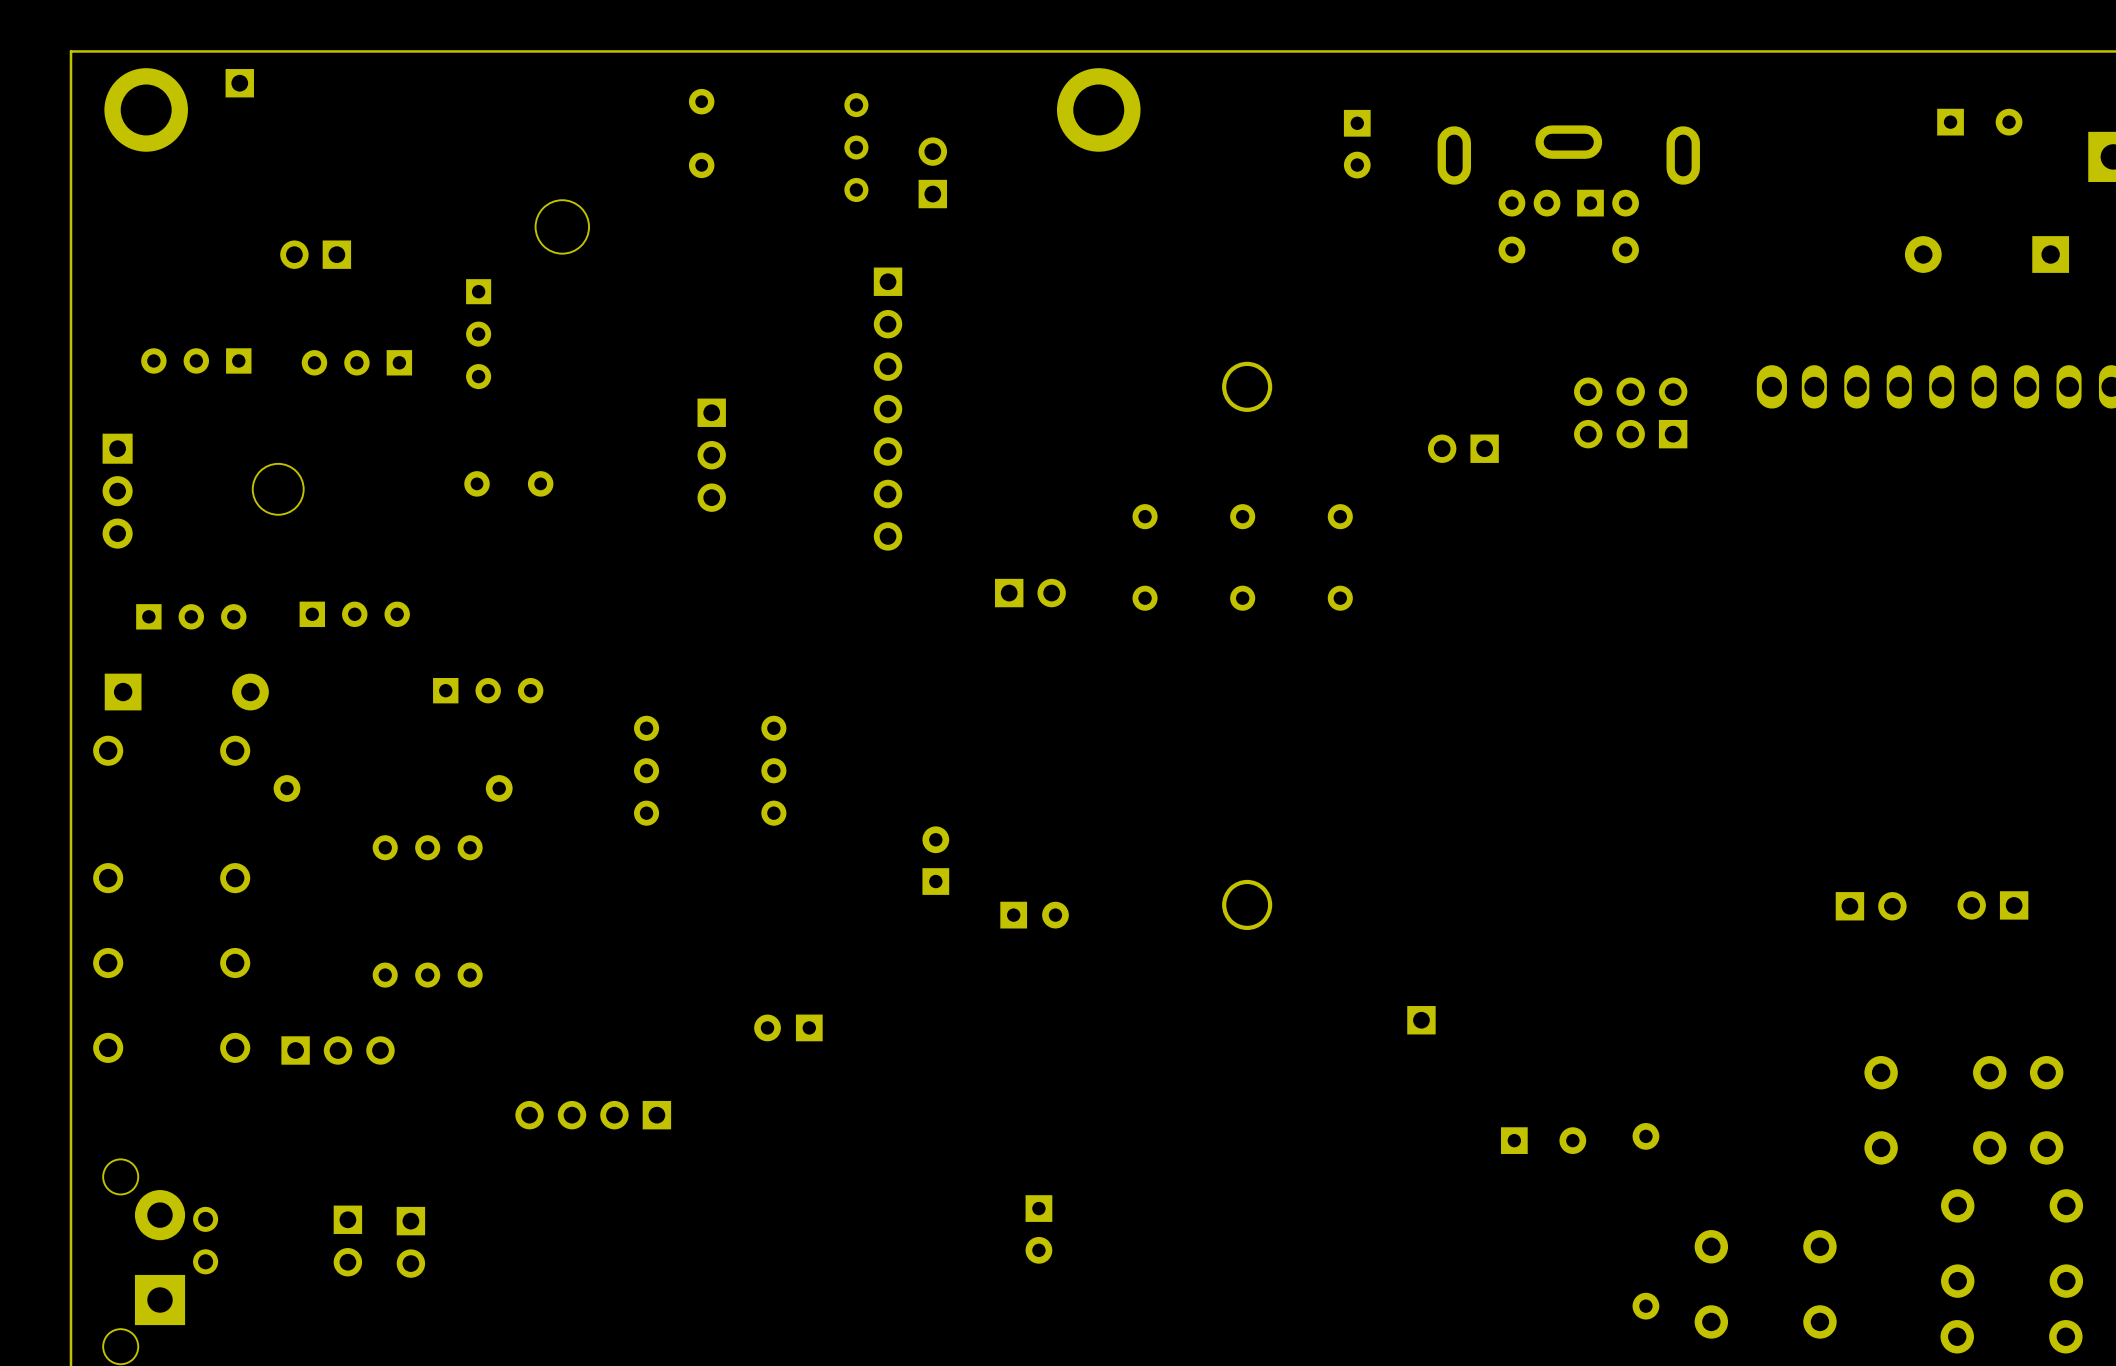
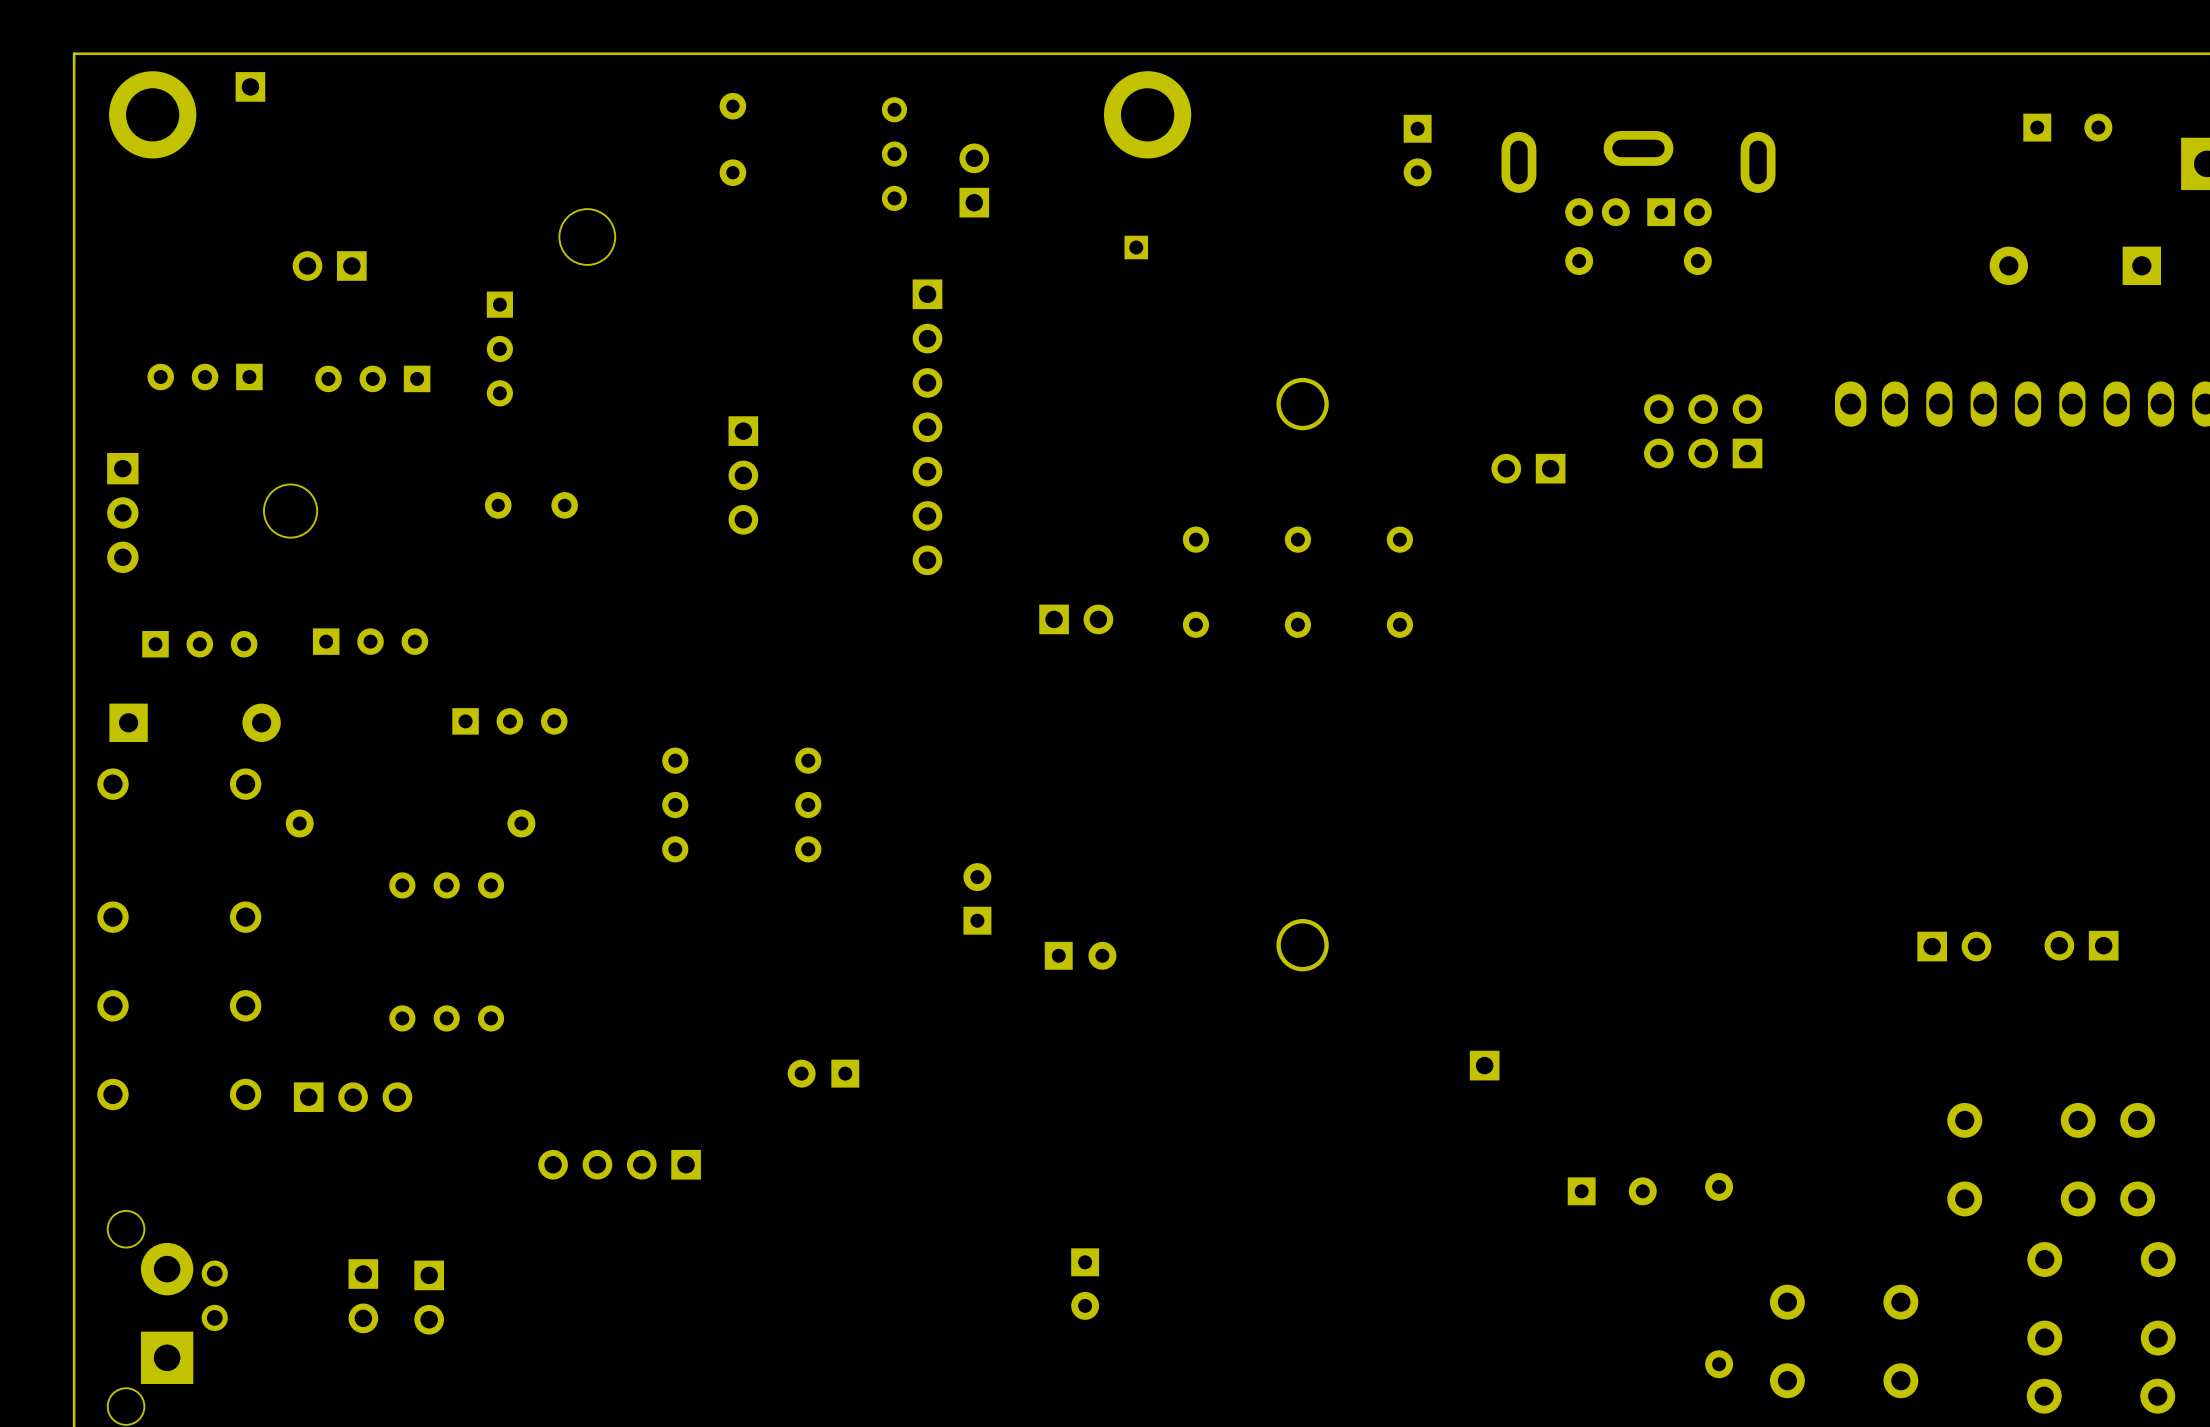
part: none -> (1136, 247)

